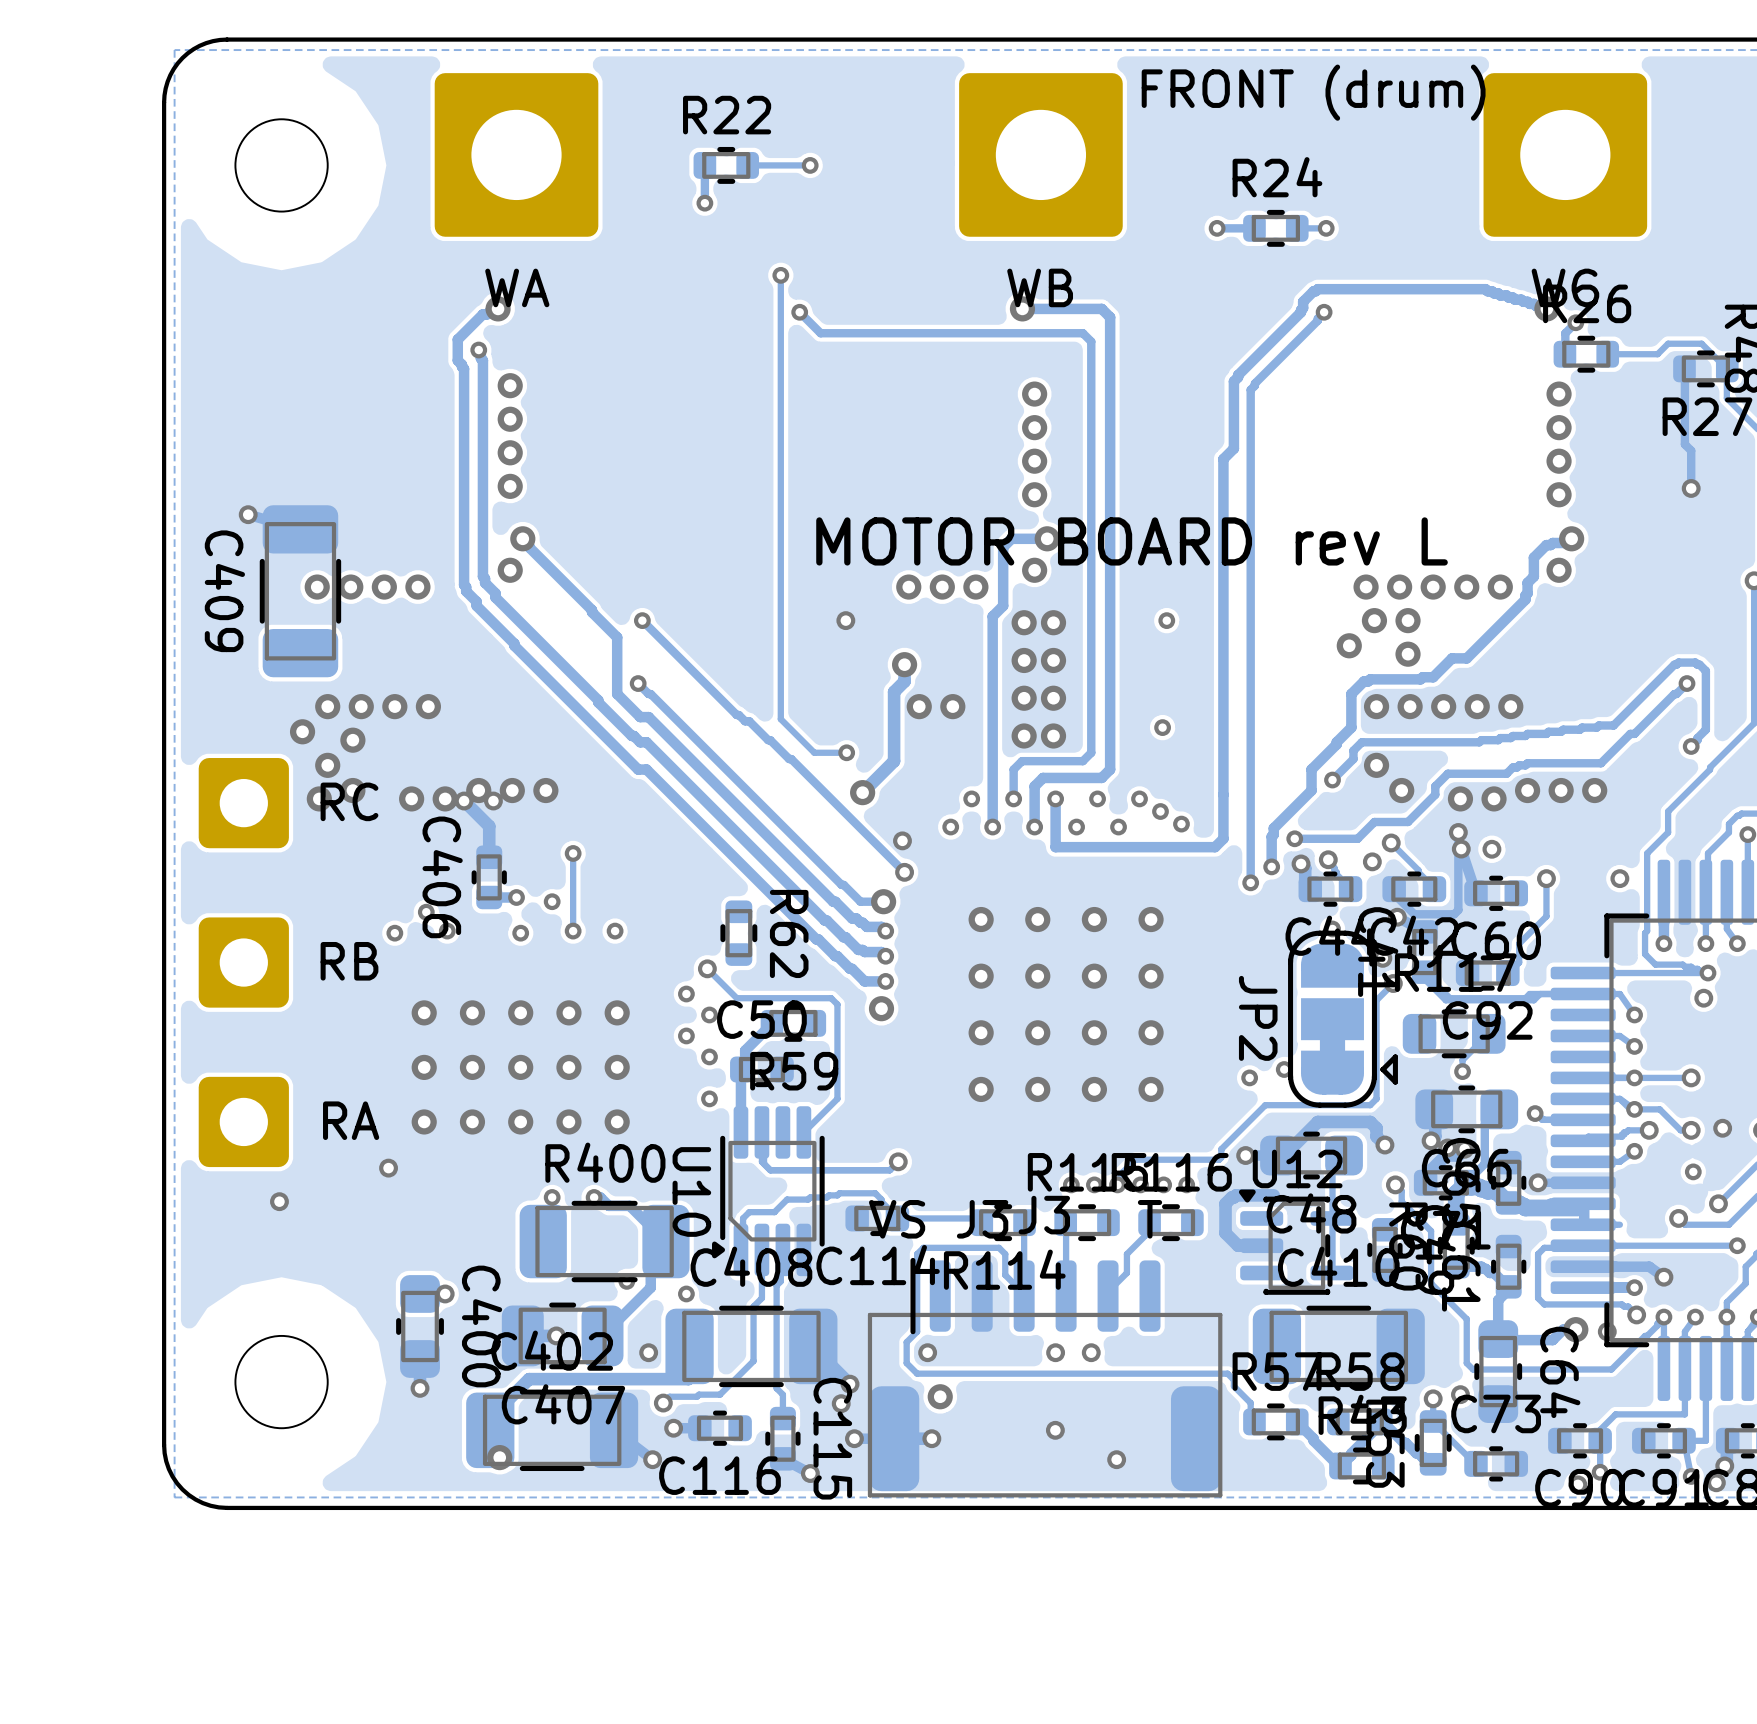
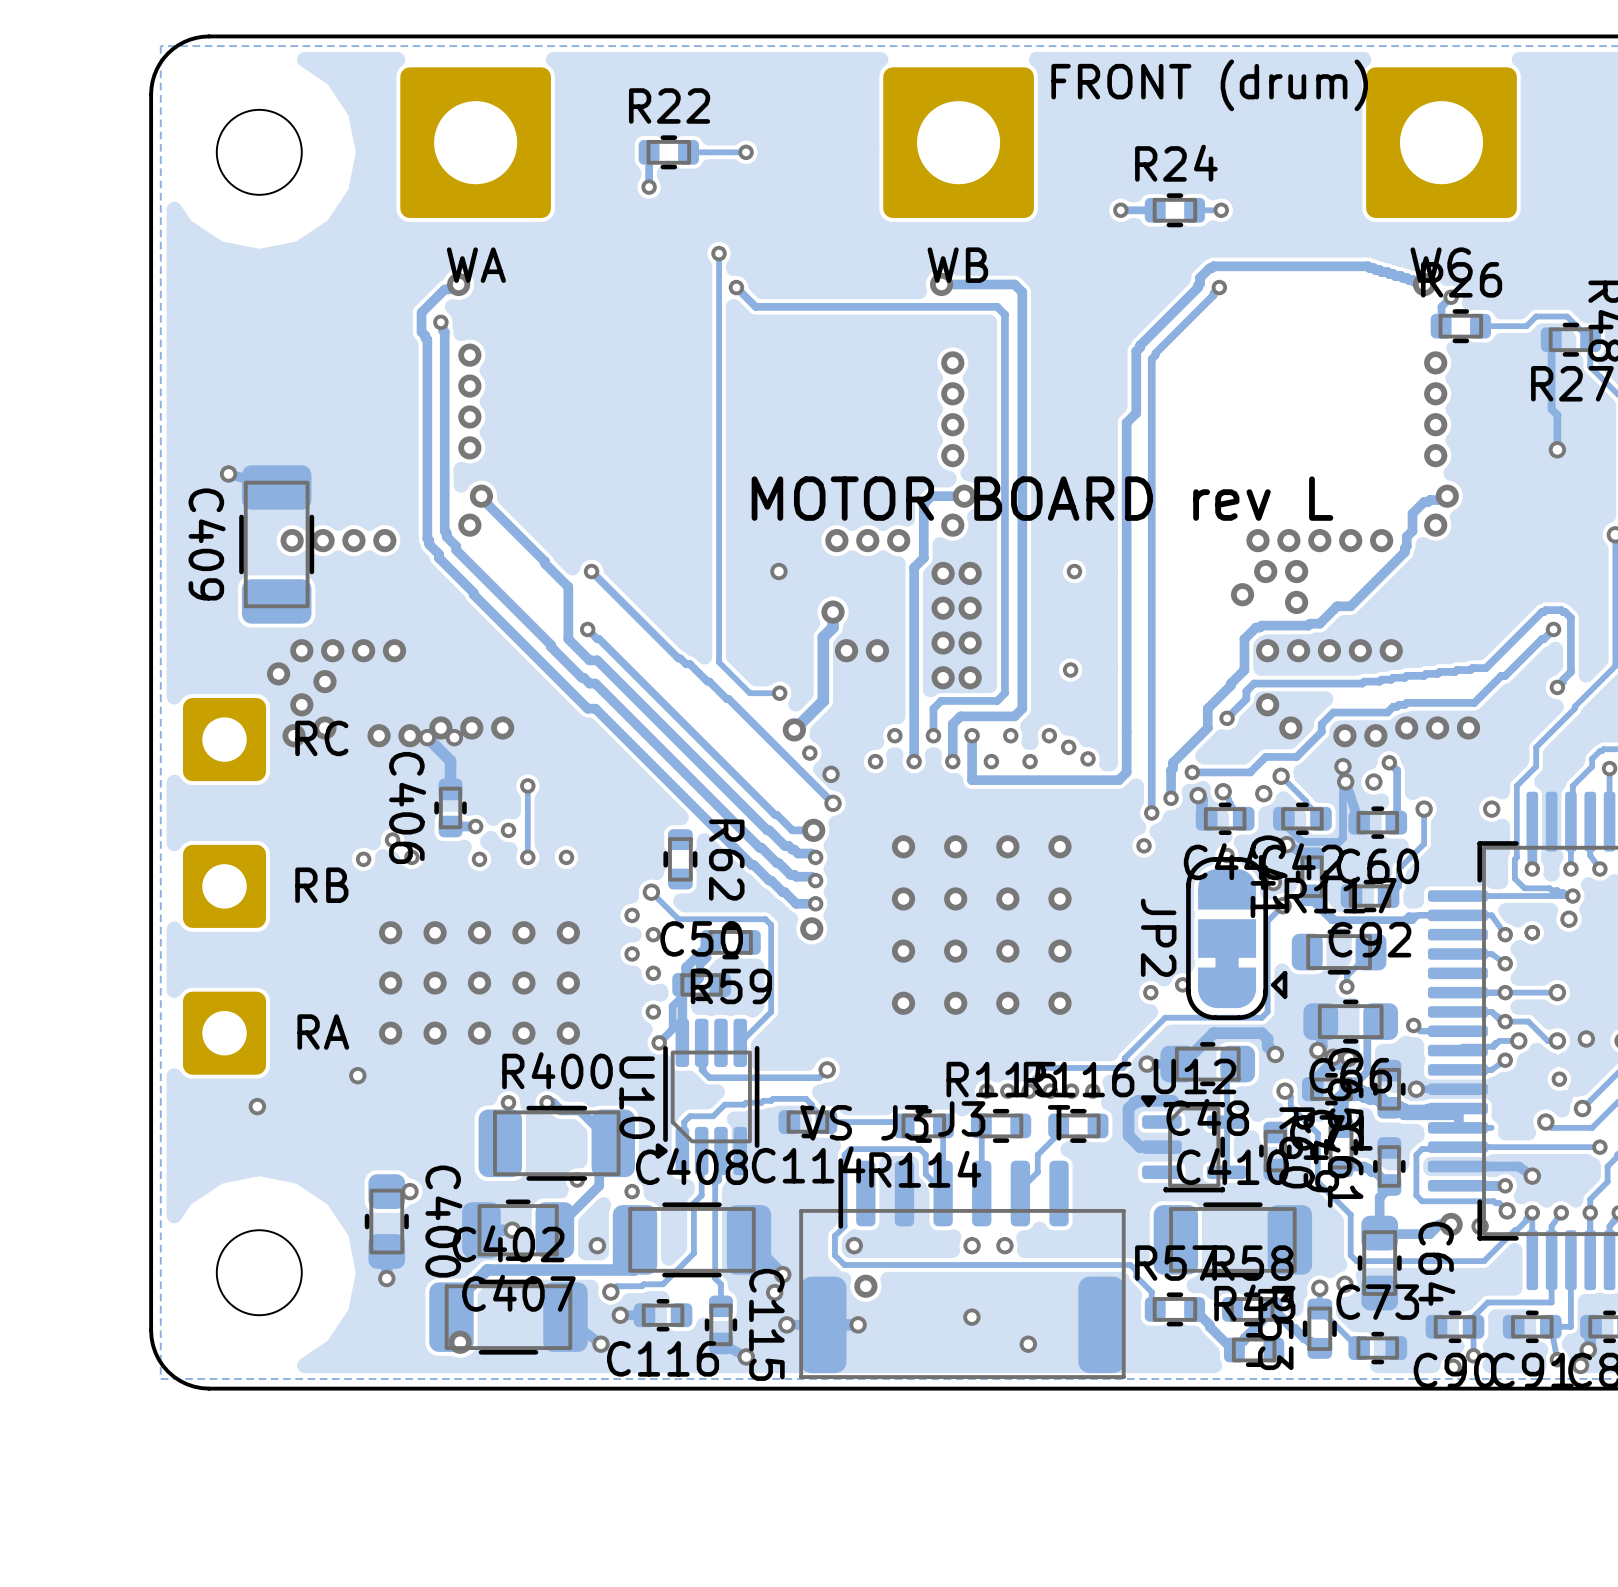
via: none -> (809, 753)
track: none -> (1389, 762) (1397, 770) (1396, 822)
via: none -> (1389, 762)
via: none -> (1144, 845)
via: none -> (1532, 932)
track: none -> (710, 942) (707, 948) (707, 957) (699, 965) (699, 979) (672, 1006) (672, 1029) (659, 1042)
via: none -> (659, 1042)

